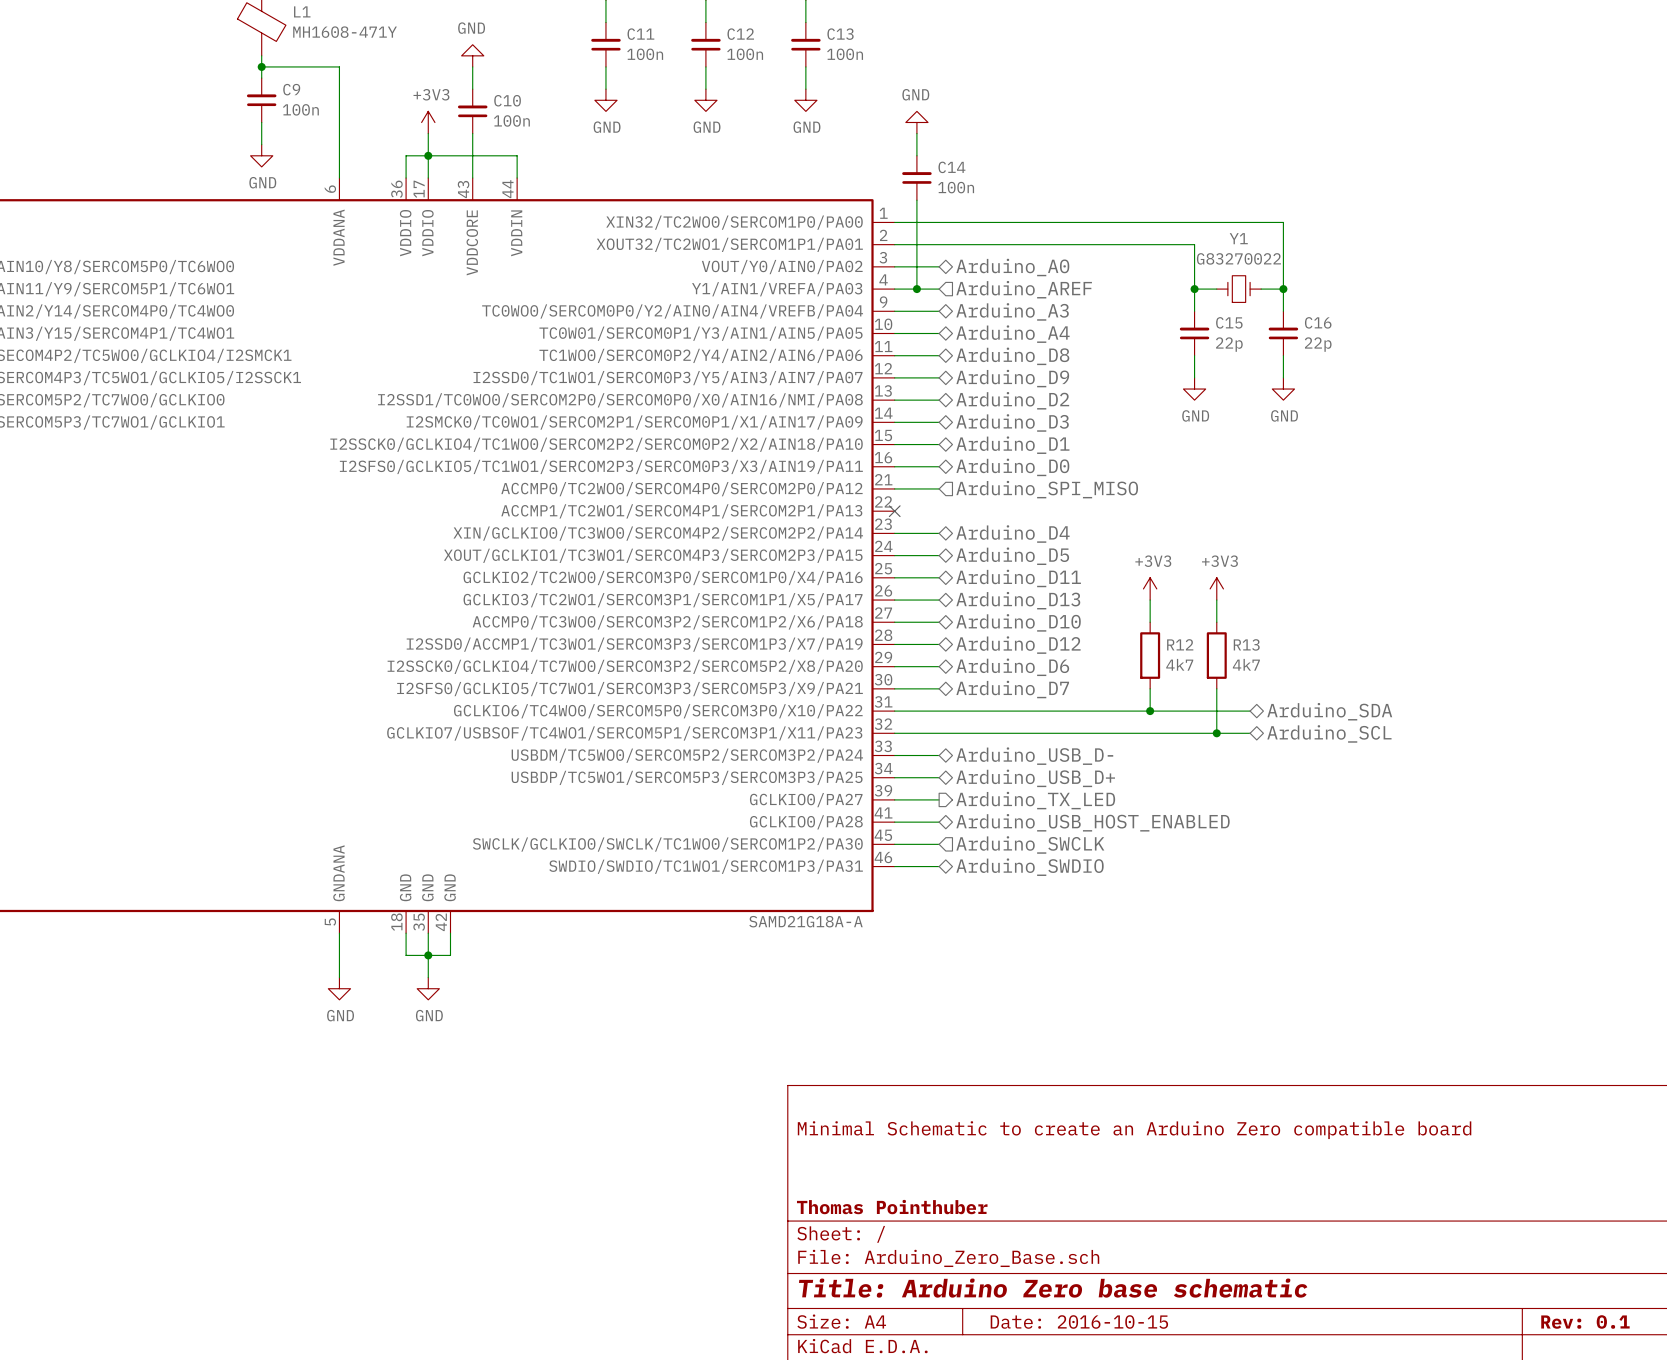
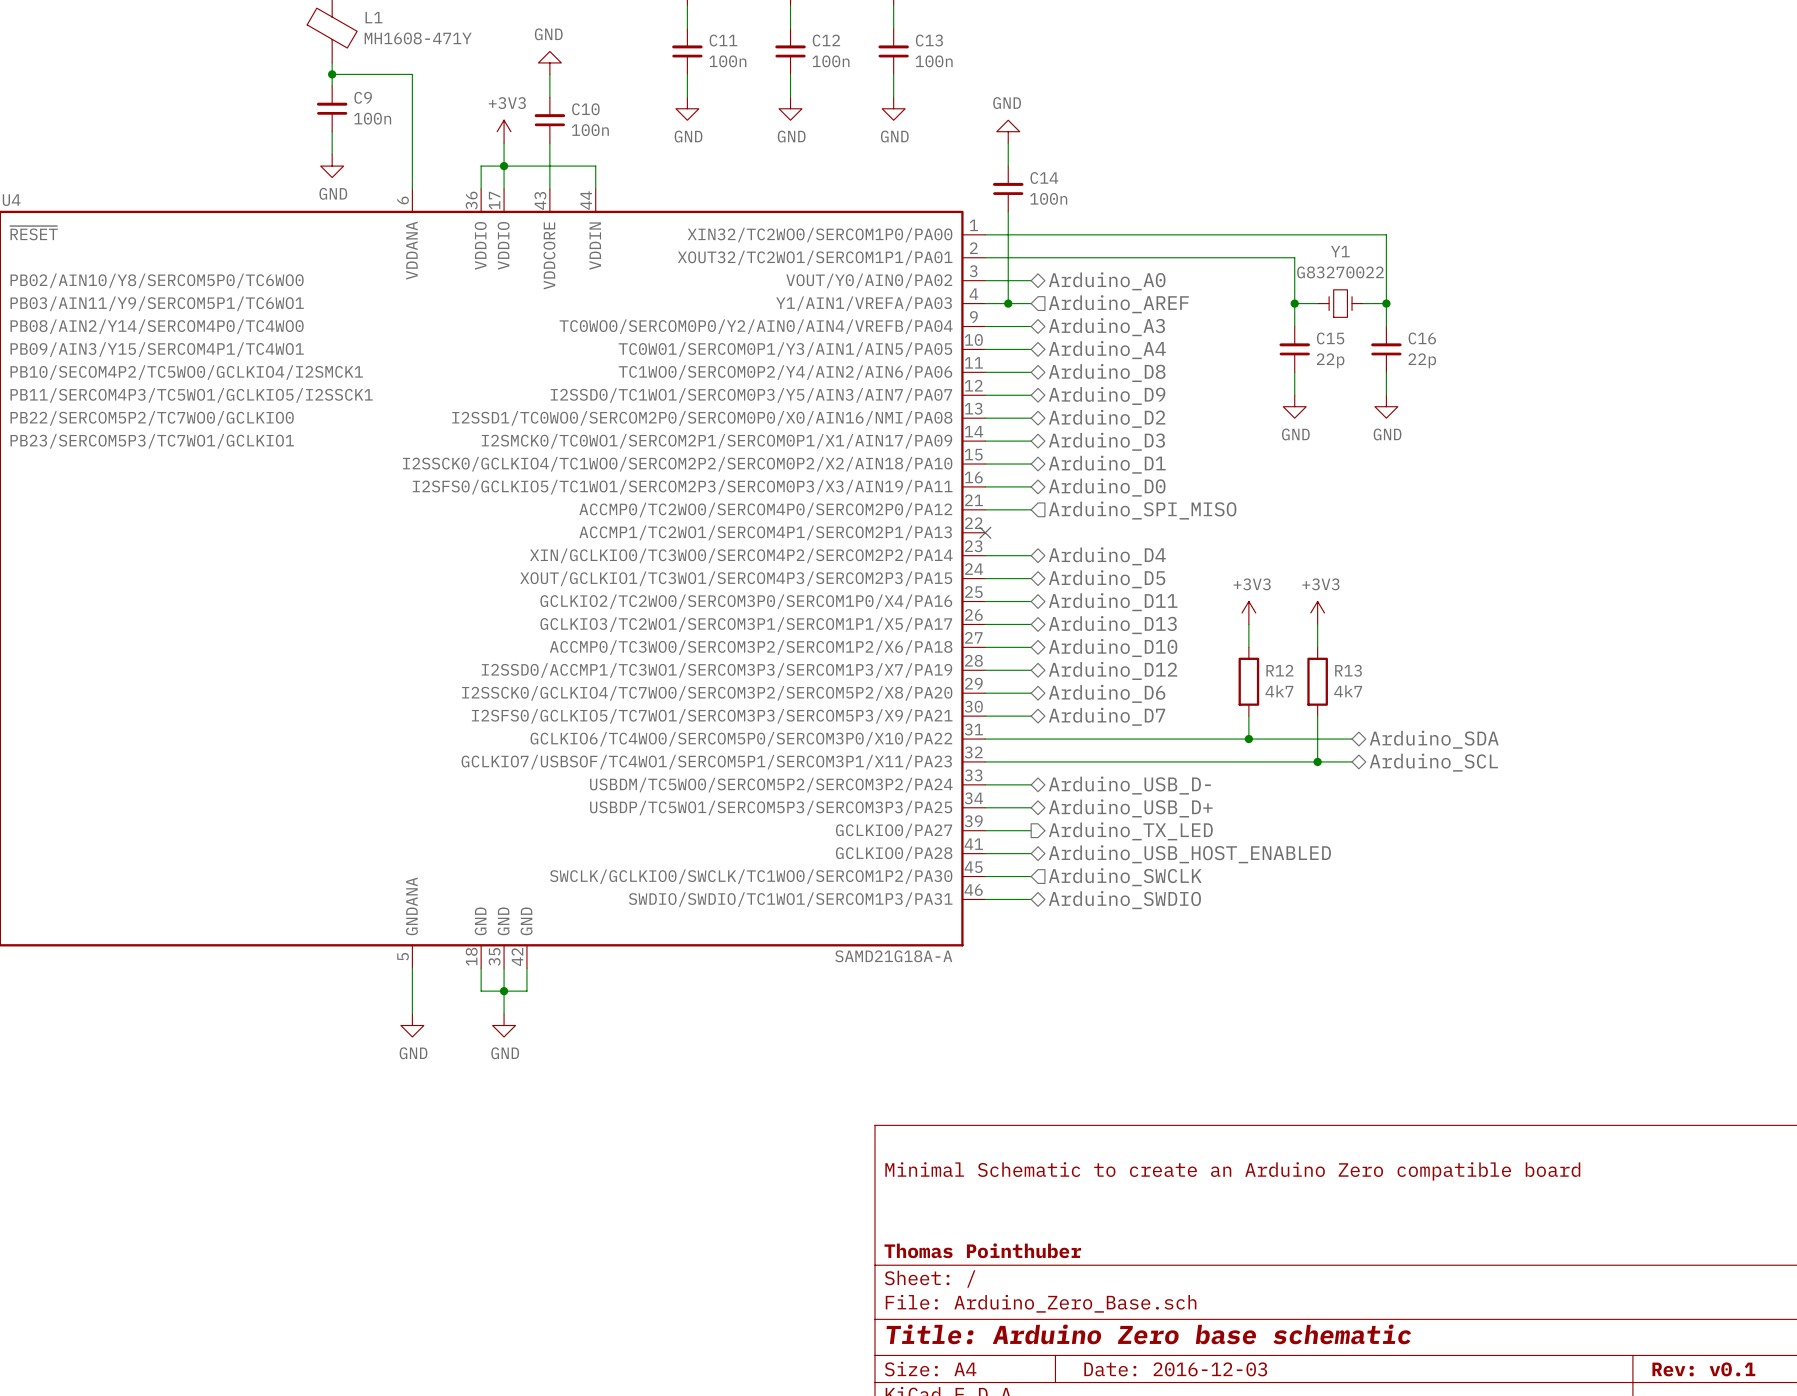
title block: Date: 2016-10-15 (1079, 1321) -> Date: 2016-12-03 (1175, 1369)
title block: Rev: 0.1 (1585, 1321) -> Rev: v0.1 (1703, 1369)

